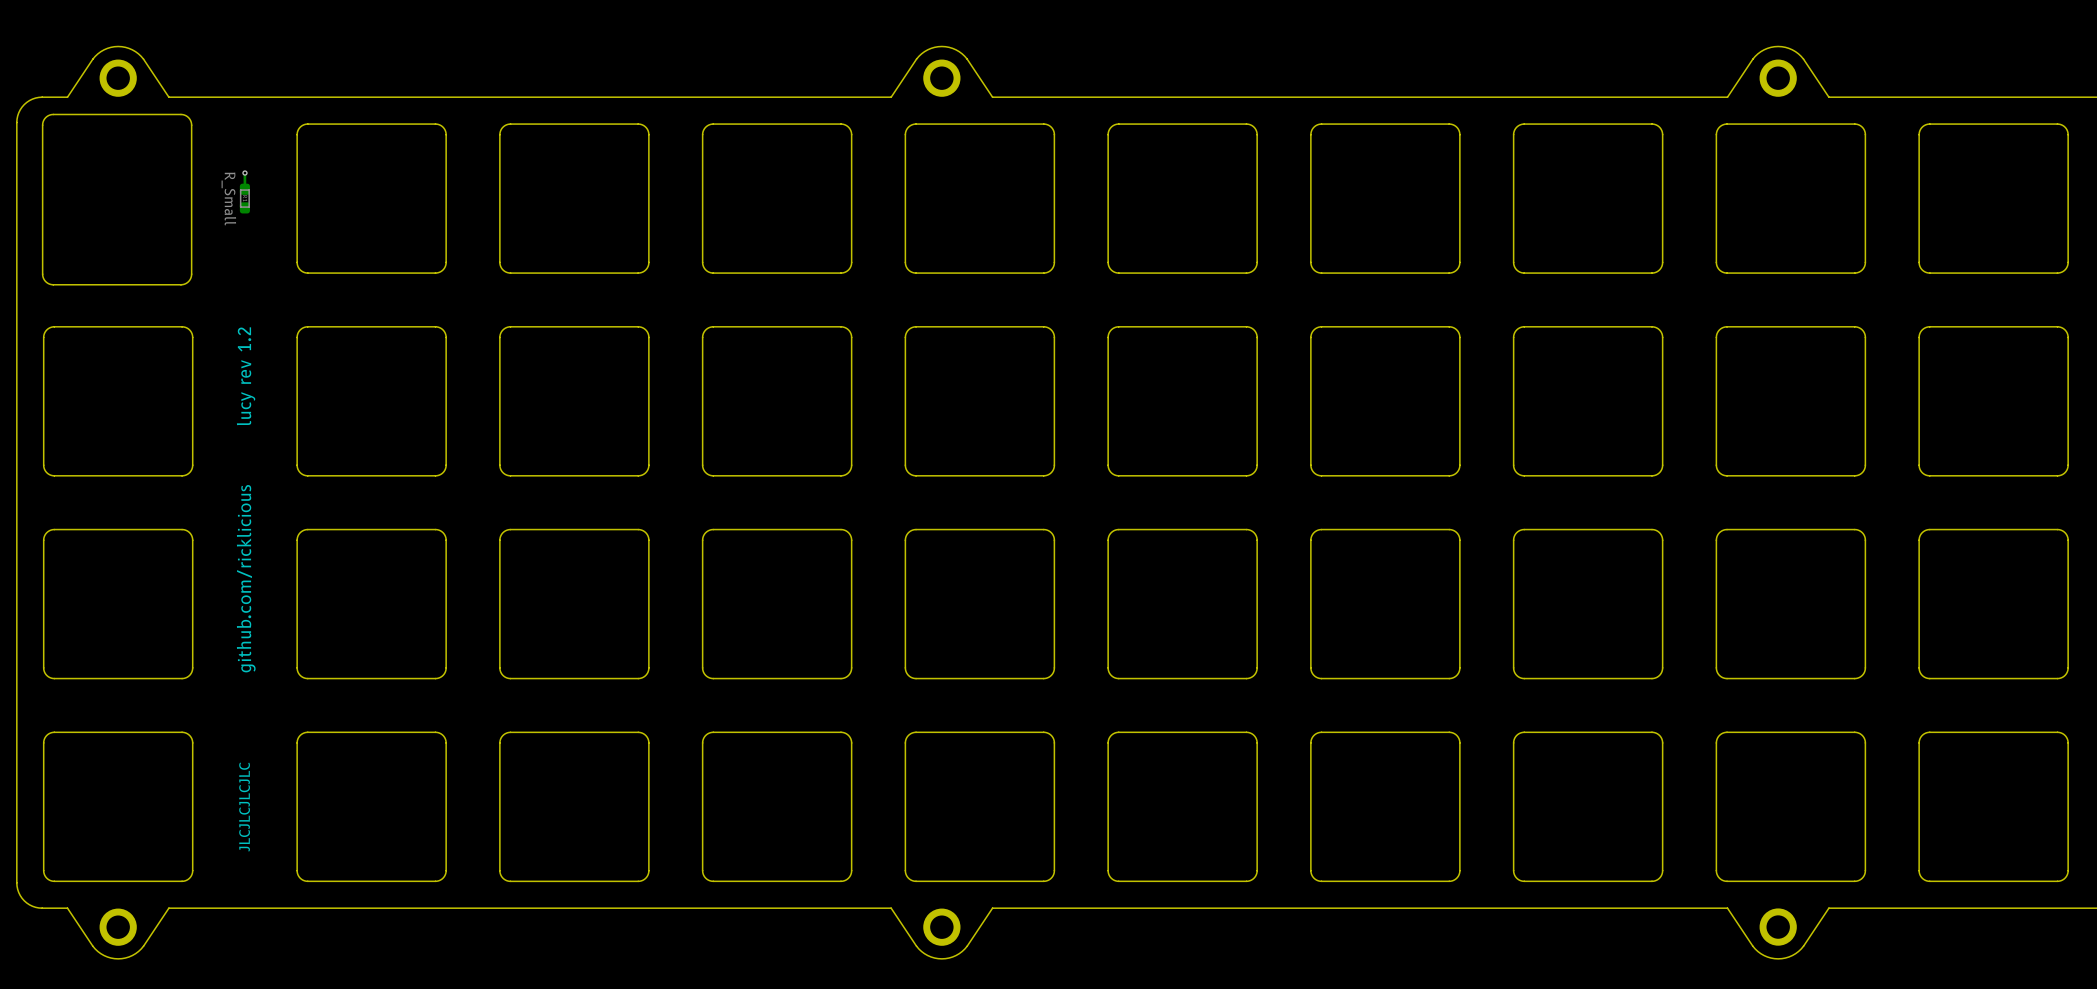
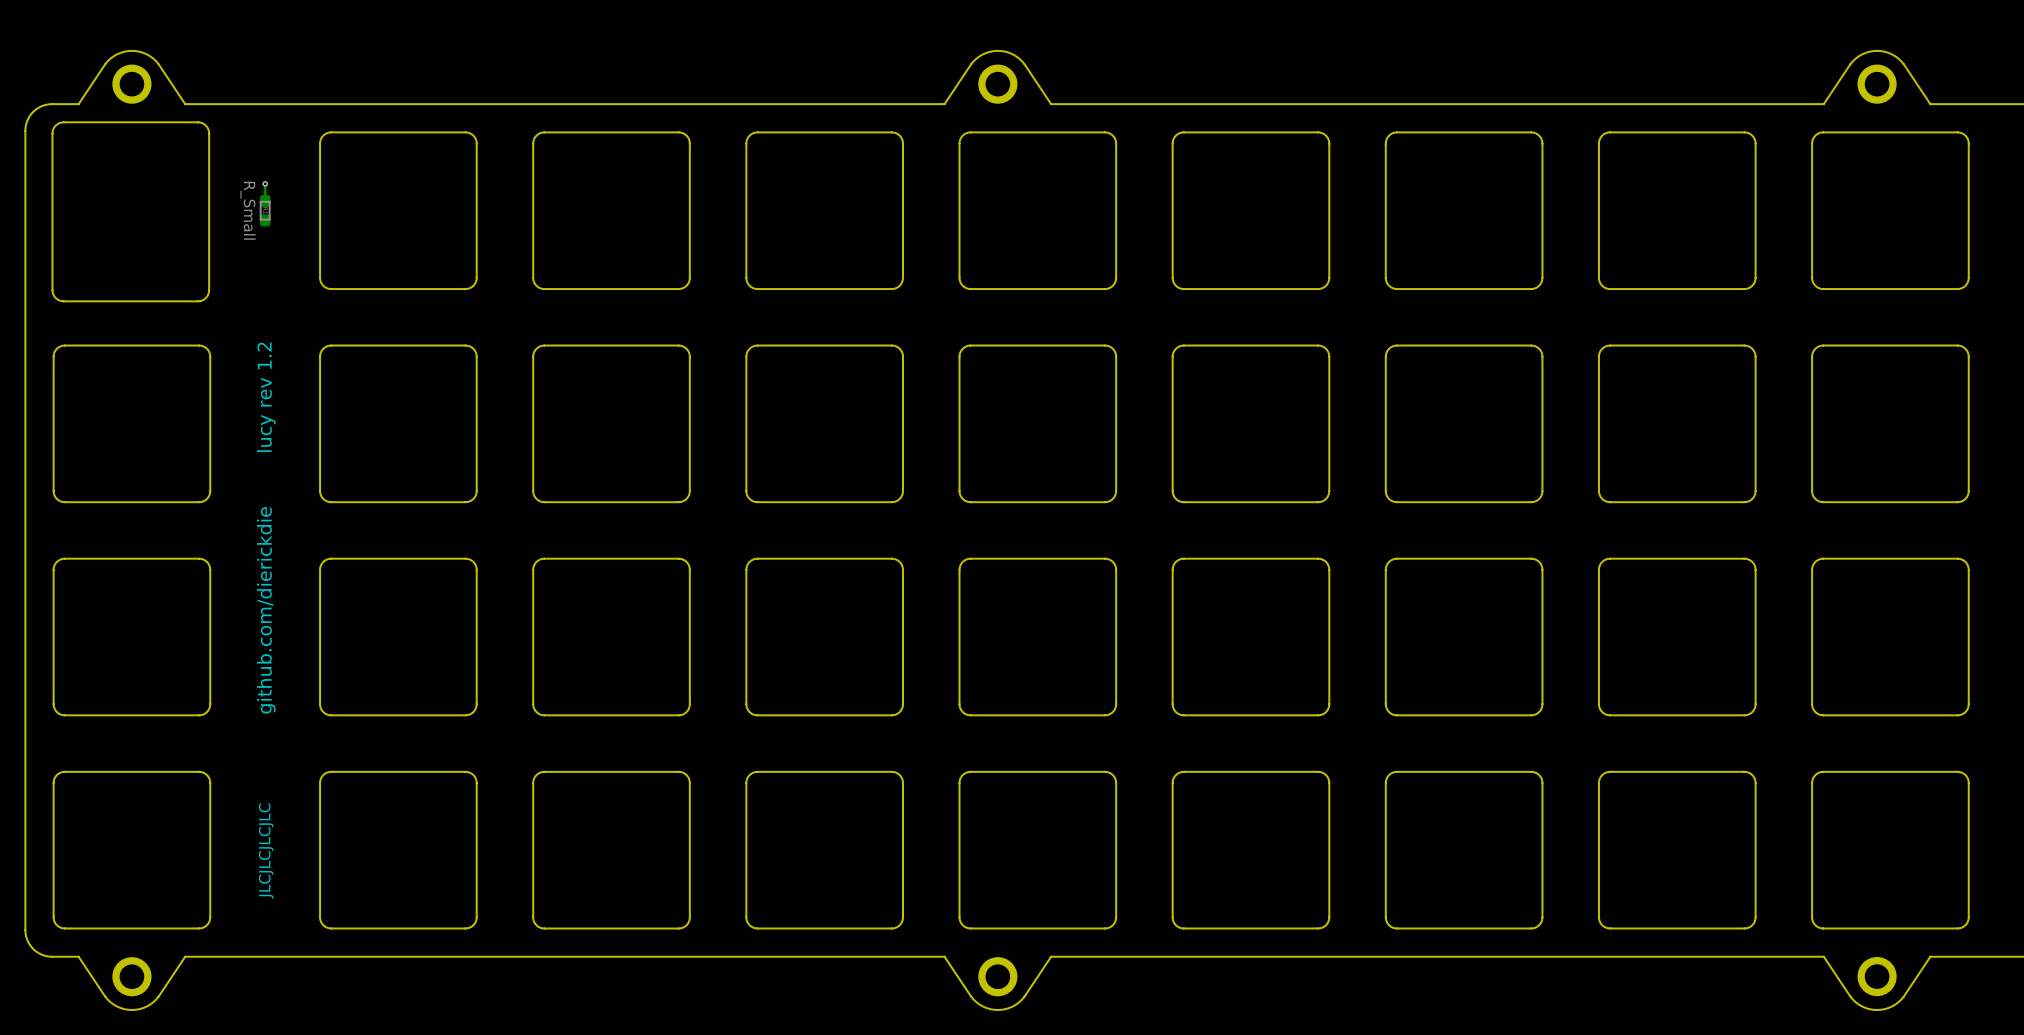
text: github.com/ricklicious (246, 578) -> github.com/dierickdie (266, 610)

